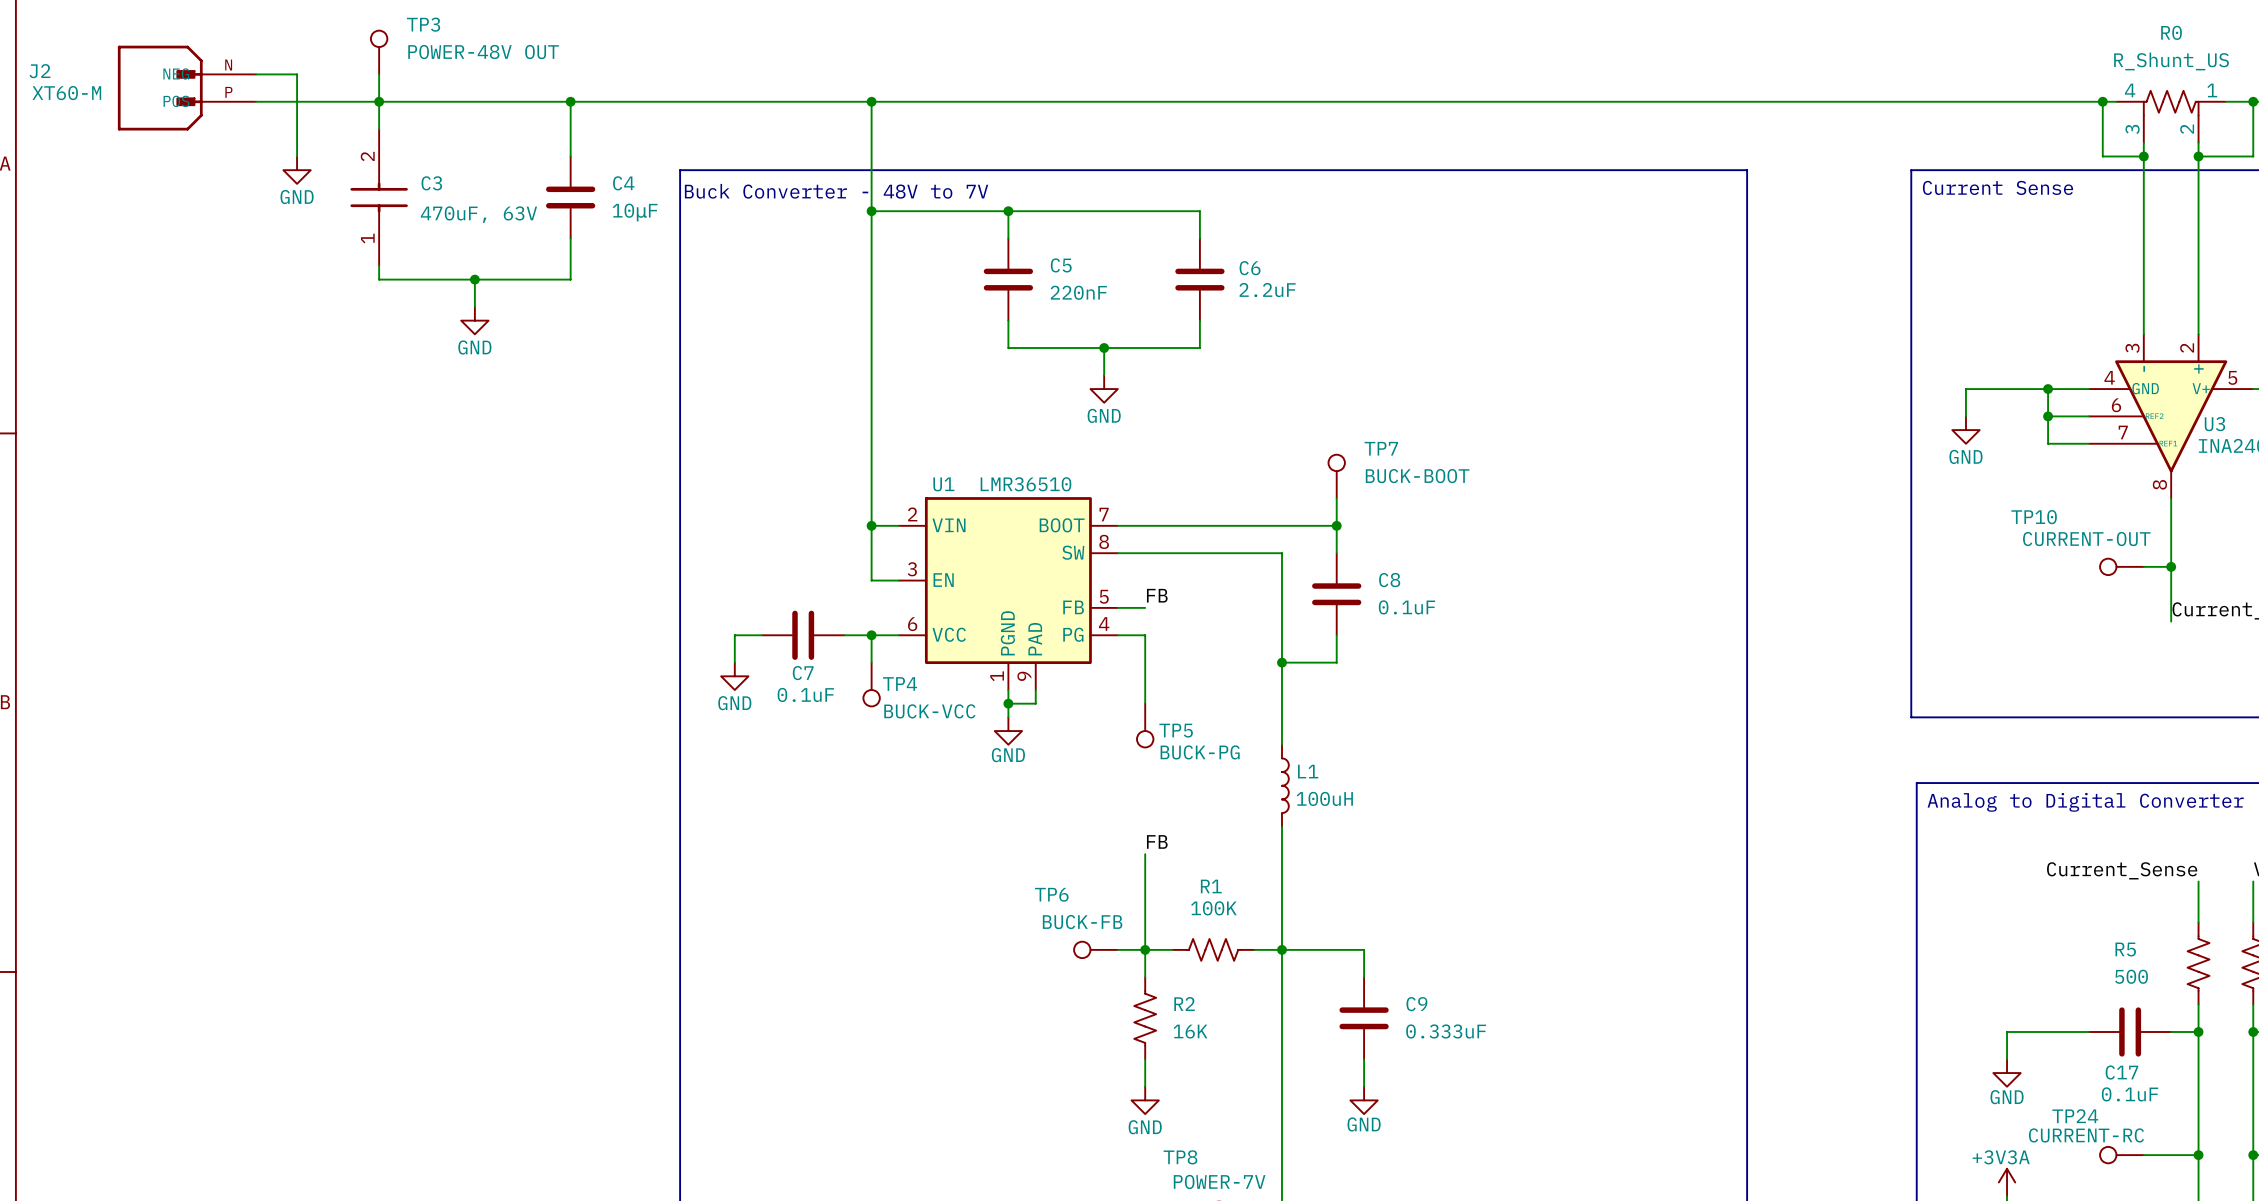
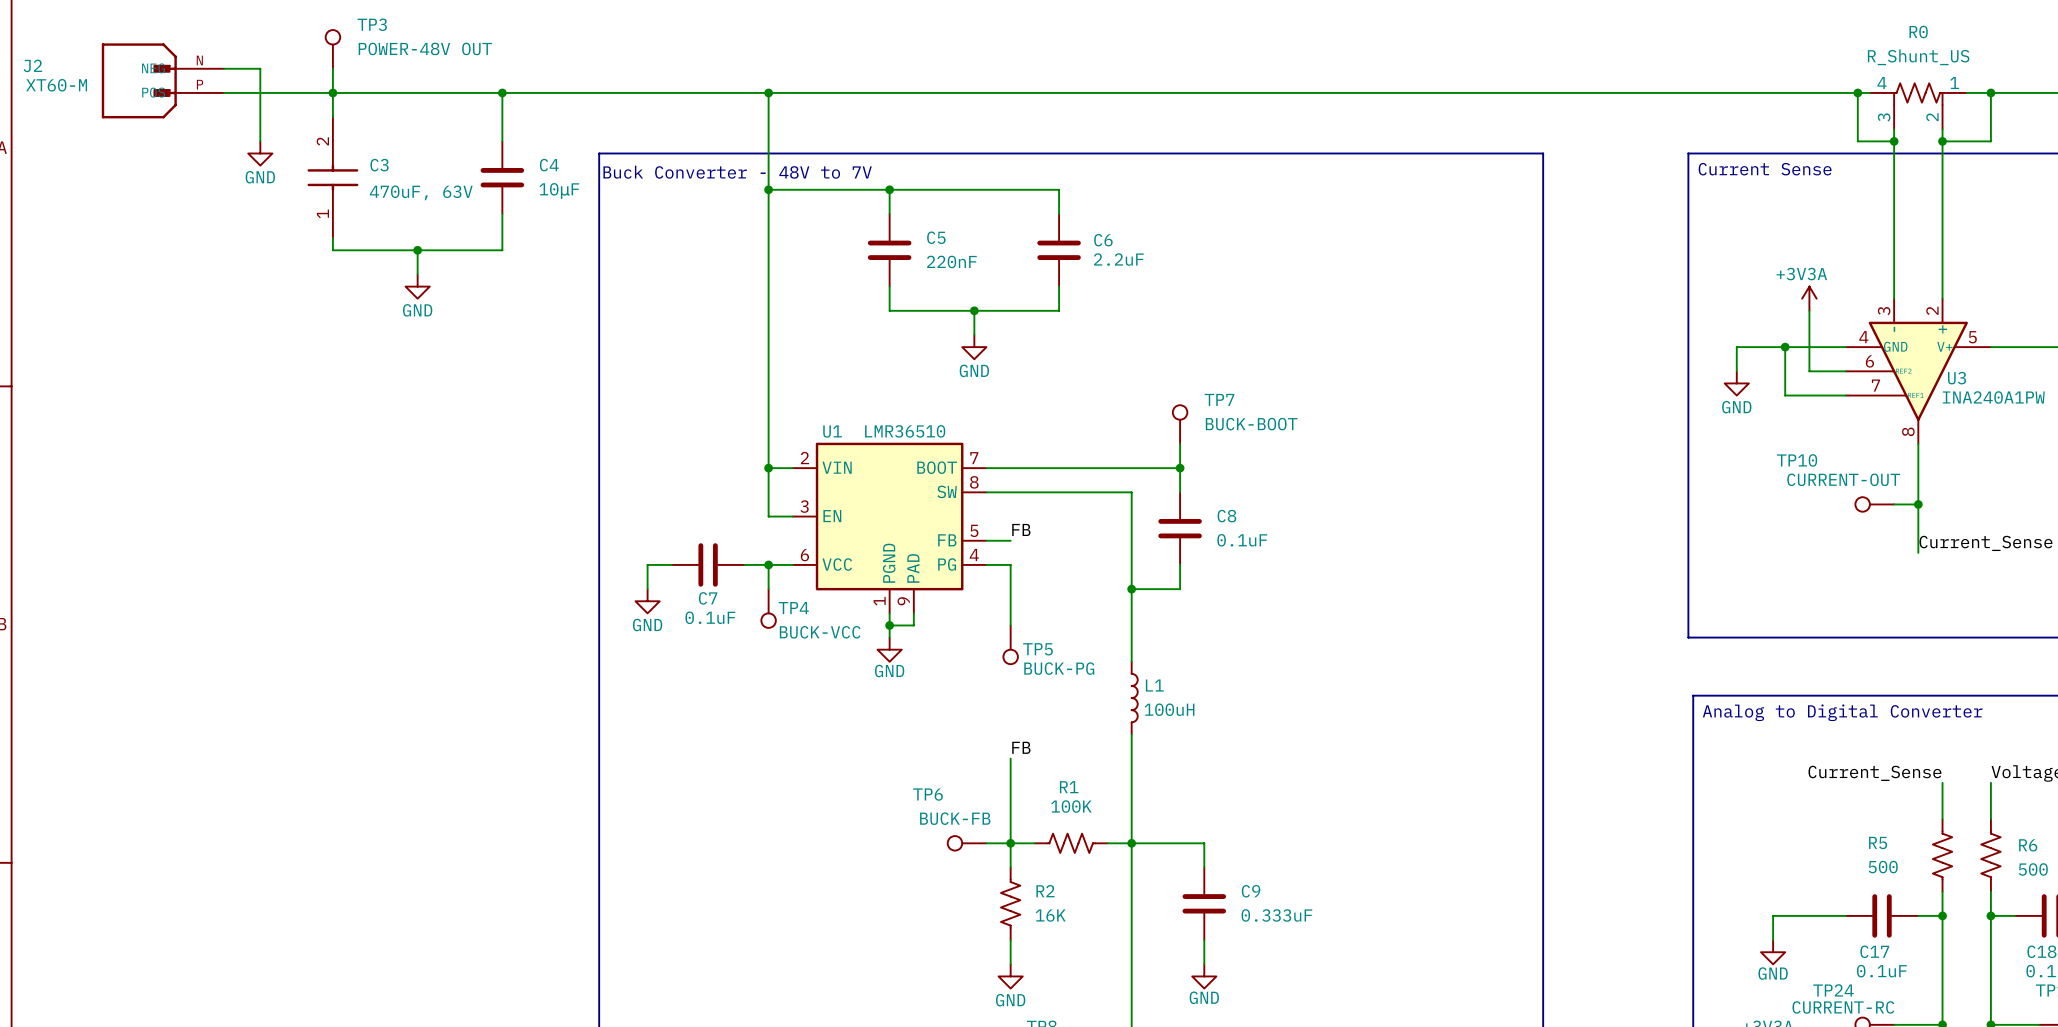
power symbol: none -> +3V3A (1809, 298)
wire: none -> (1809, 310) (1809, 347)
junction: none -> (1785, 347)
junction: (2048, 389) -> none
wire: (2048, 416) (2048, 443) -> (1785, 347) (1785, 395) (1809, 395)
junction: (2048, 416) -> none

